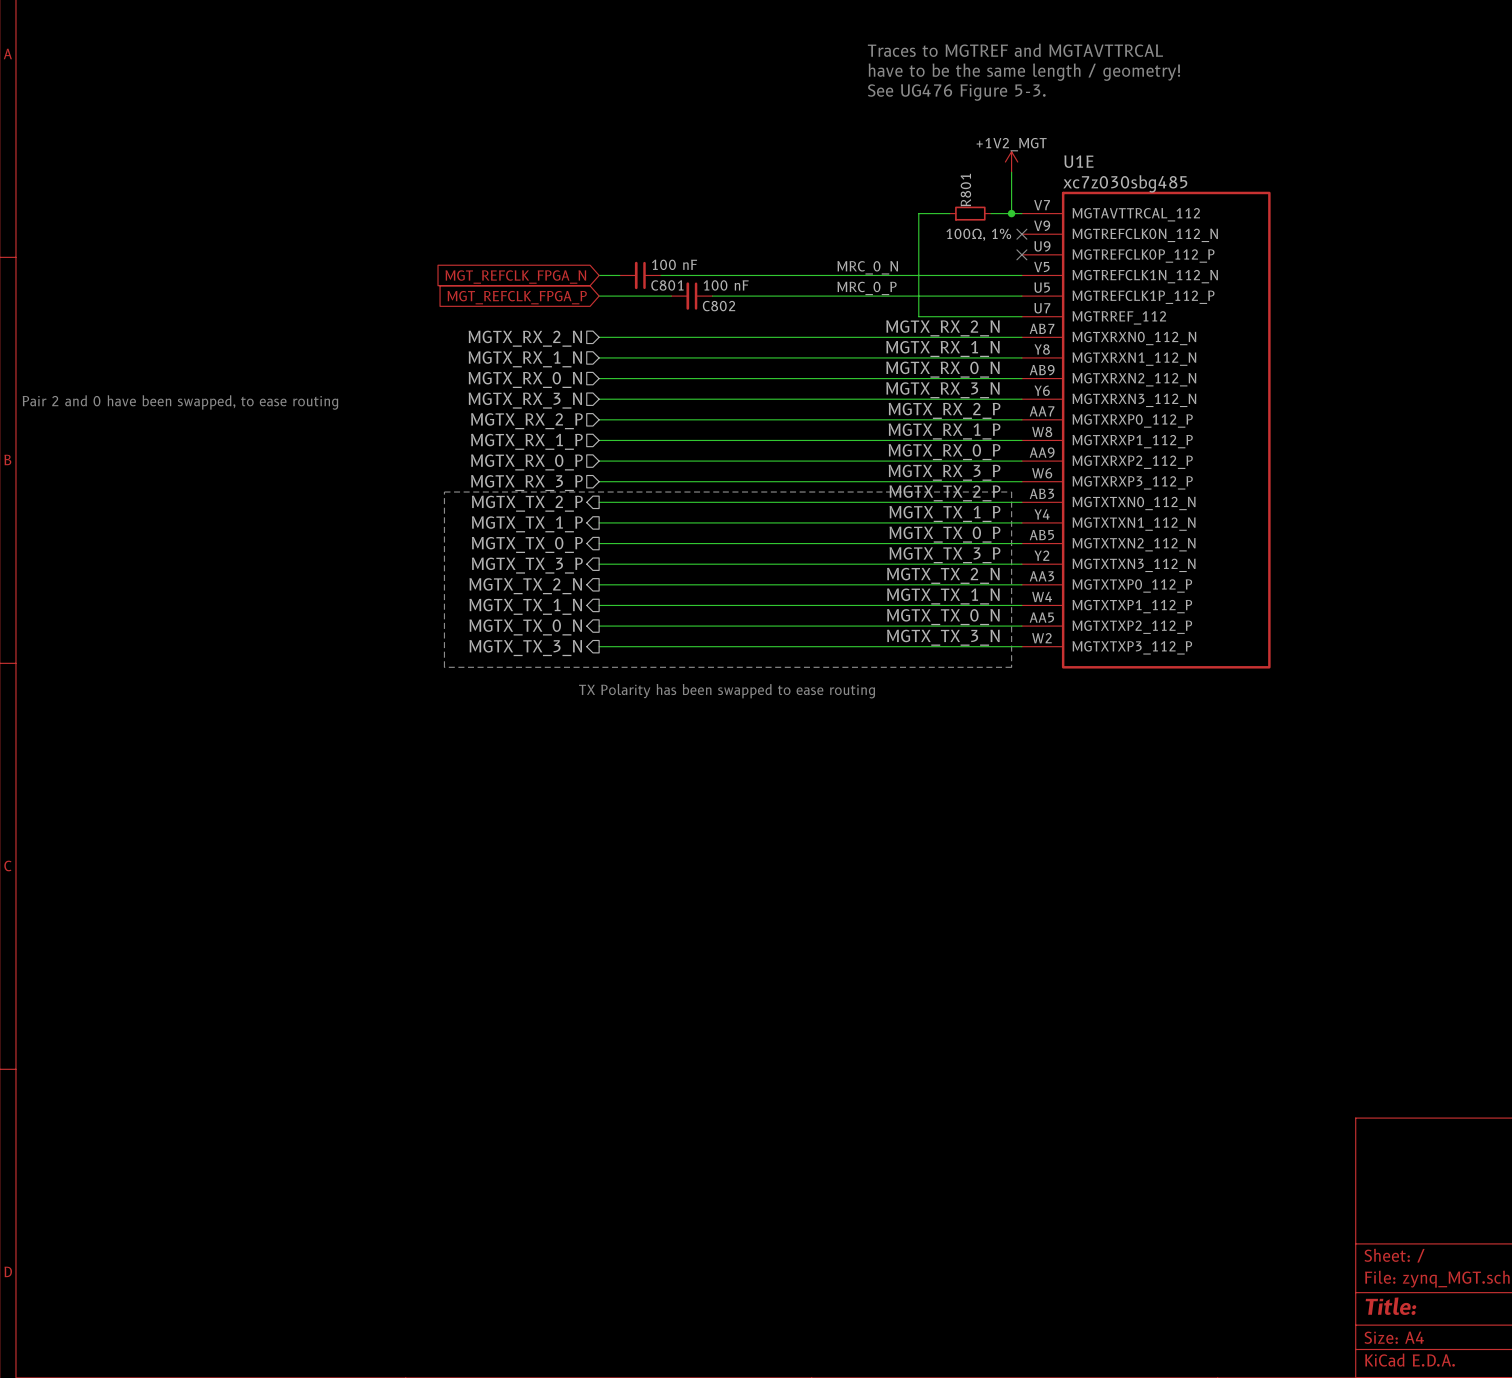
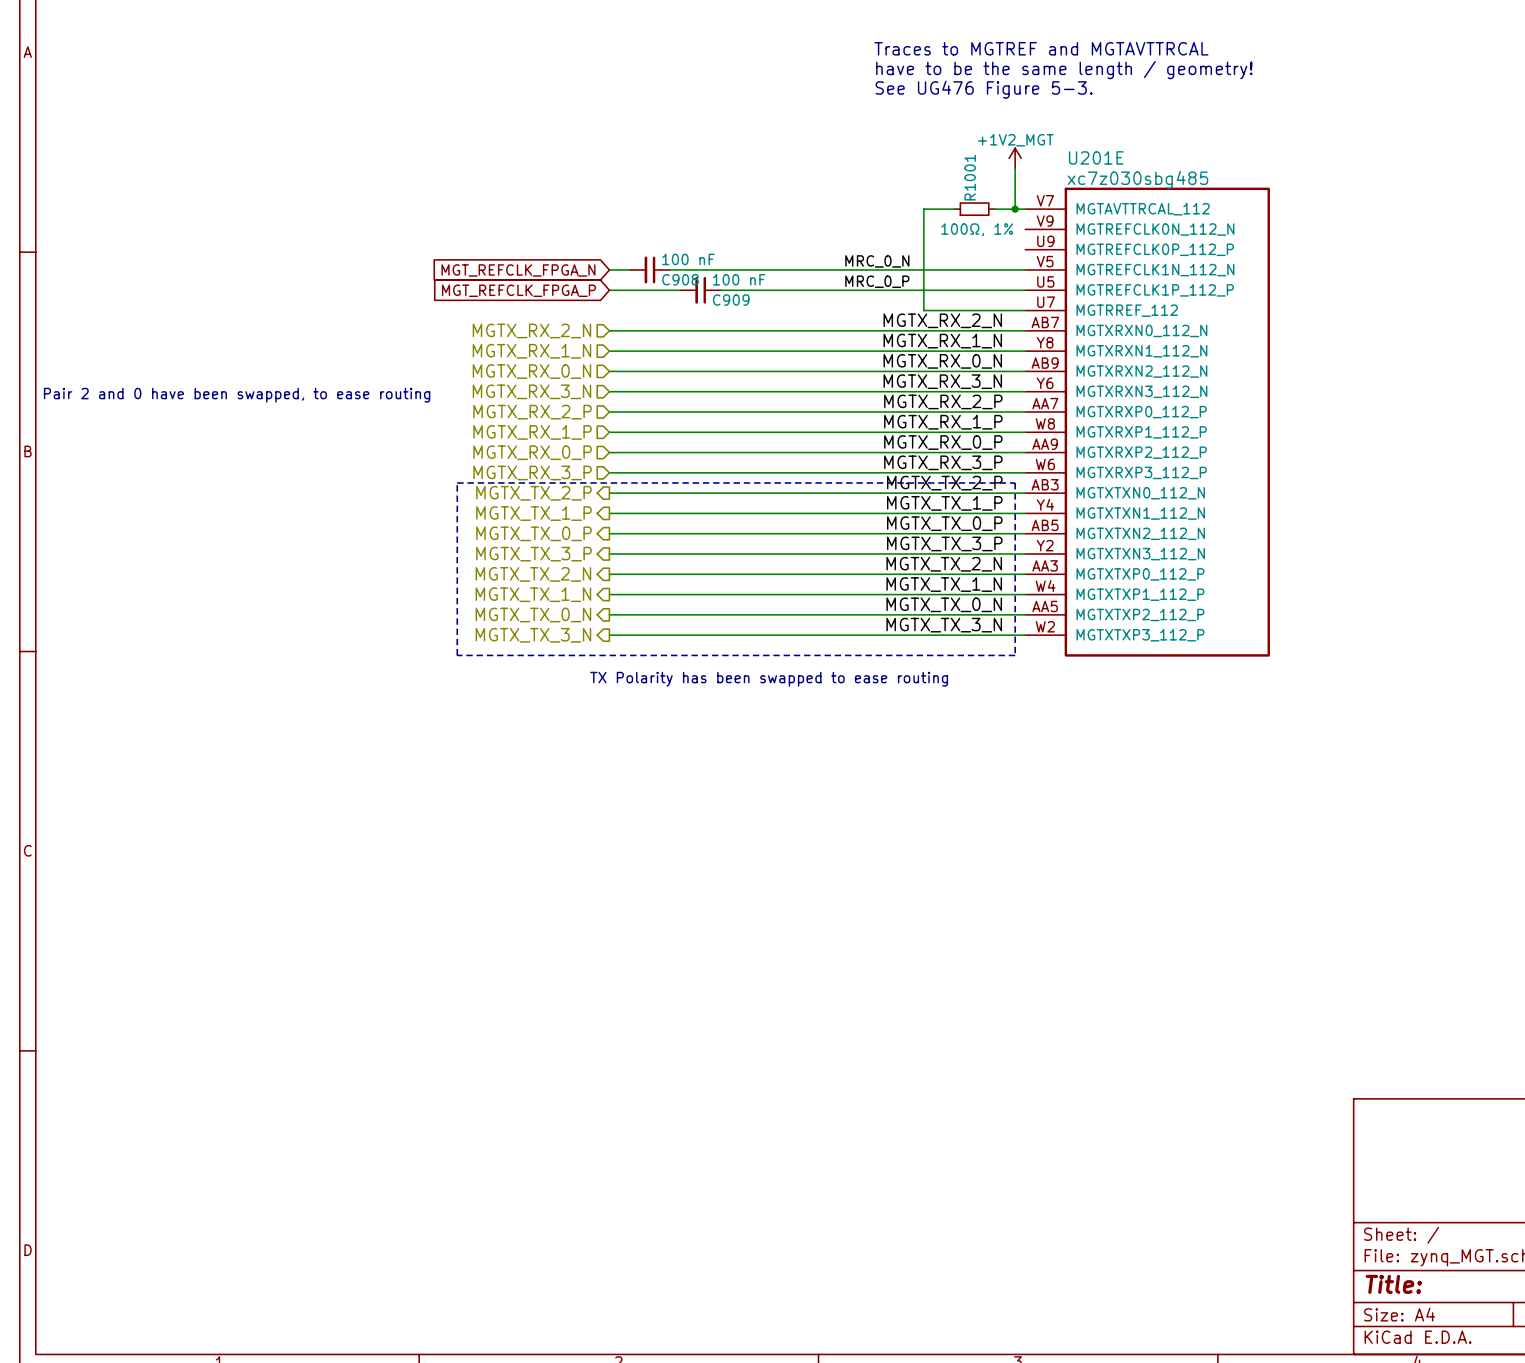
U1E name: U1E (1079, 161) -> U201E (1096, 157)
R801 name: R801 (965, 190) -> R1001 (970, 177)
no-connect mark: (1021, 234) -> none
no-connect mark: (1021, 254) -> none
C801 name: C801 (667, 285) -> C908 (680, 279)
C802 name: C802 (719, 306) -> C909 (731, 300)

